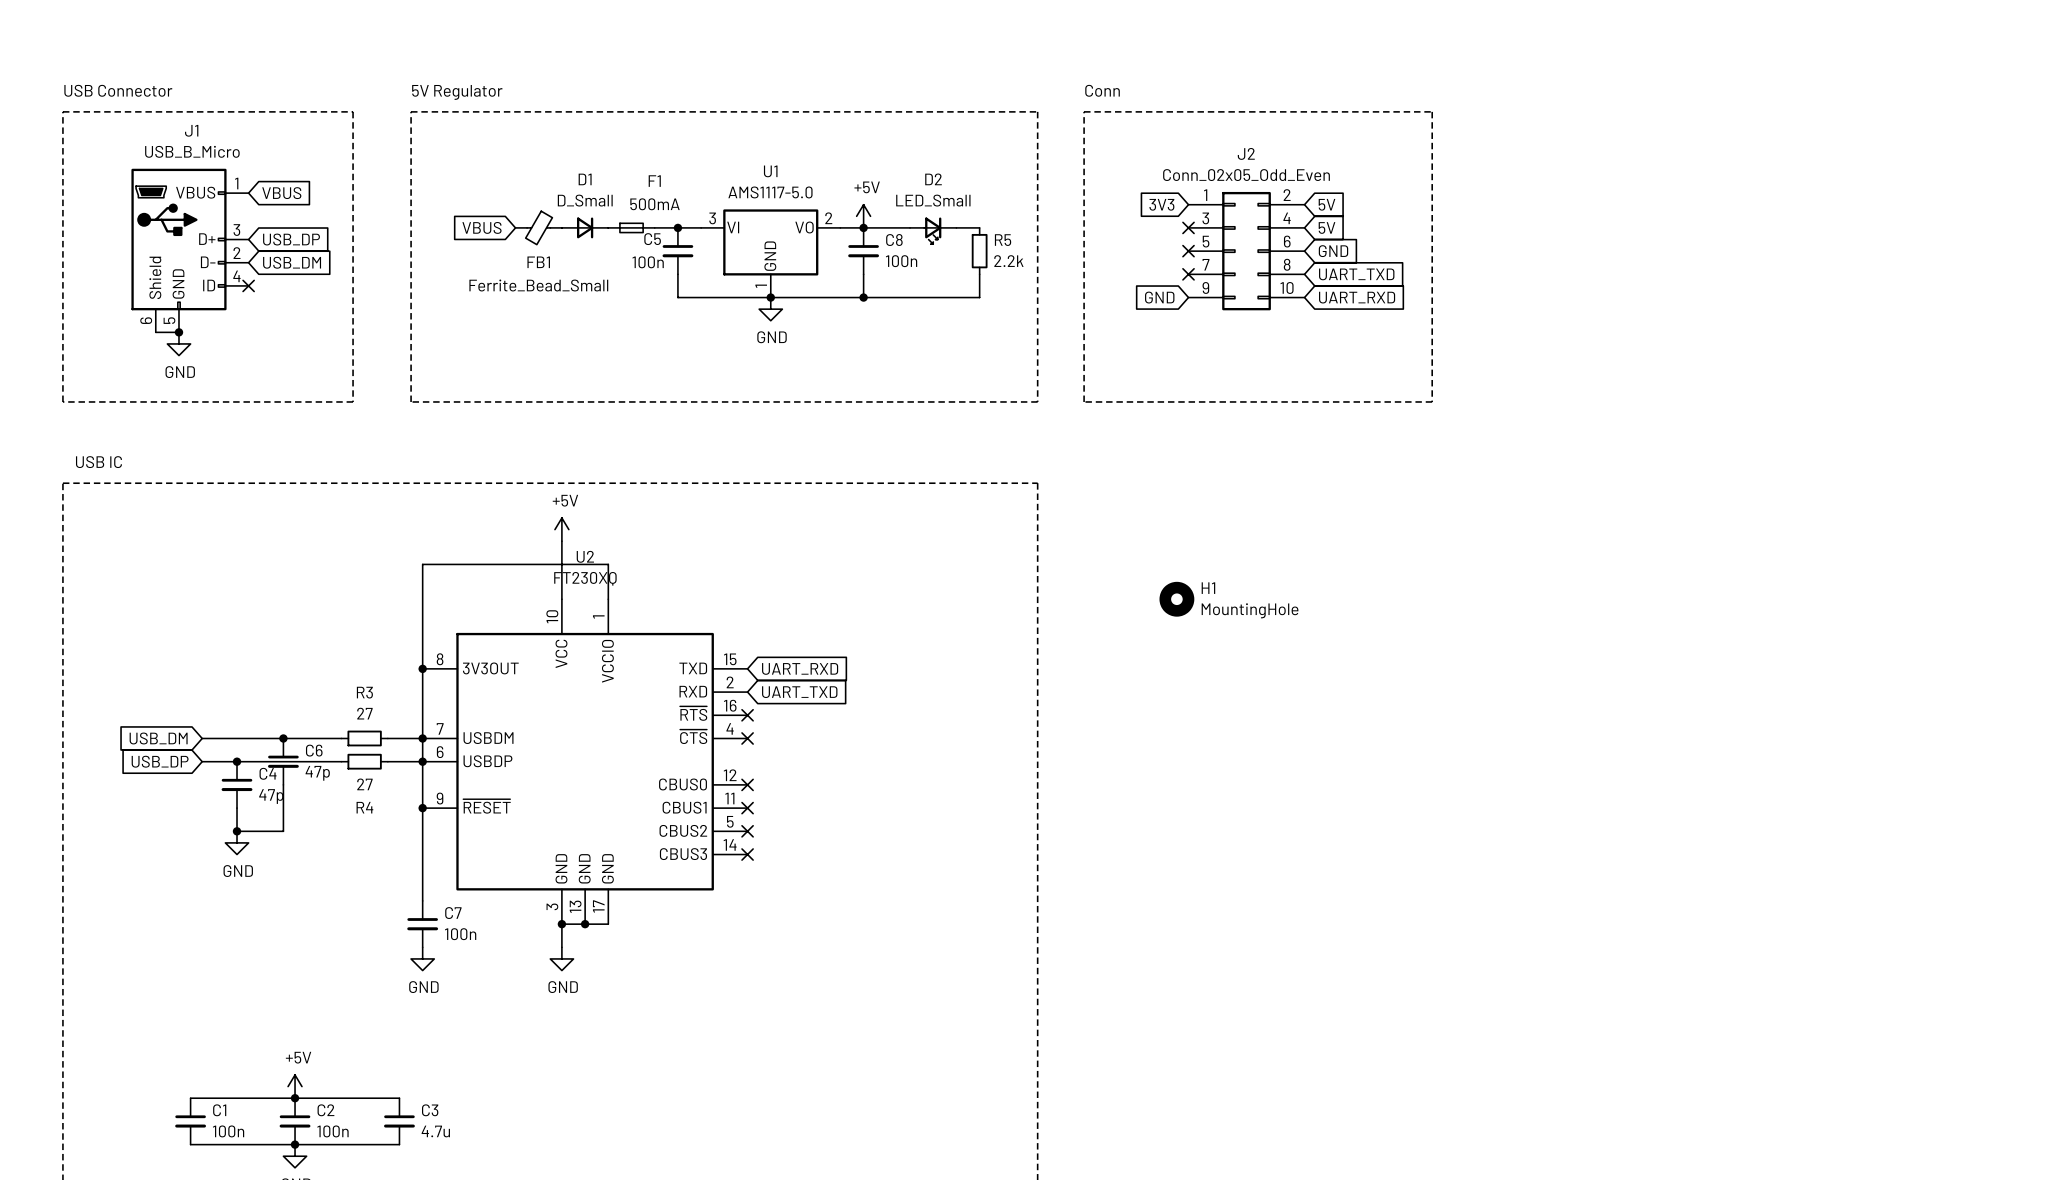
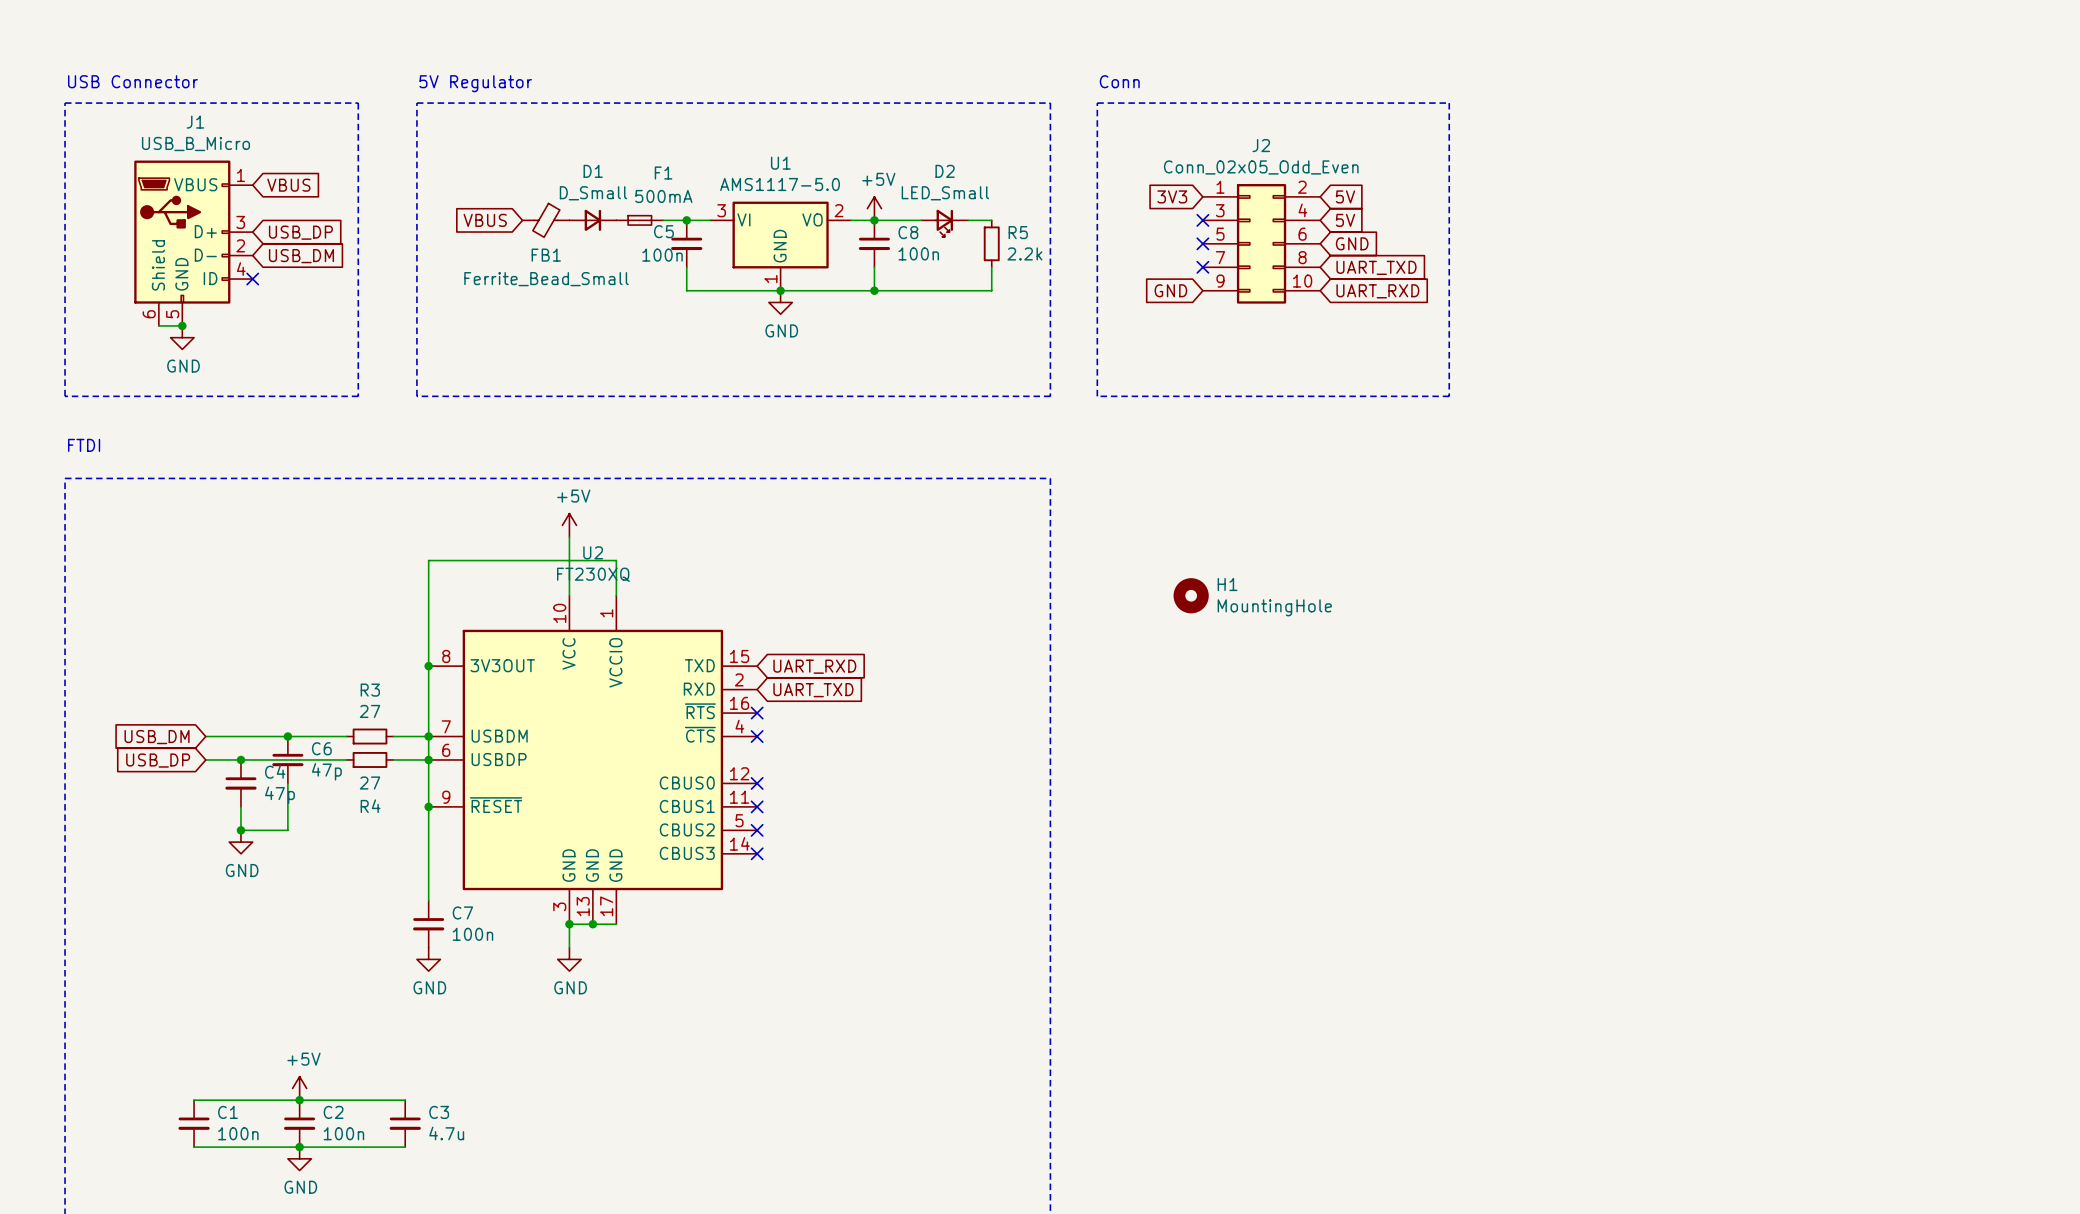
text: none -> FTDI (84, 445)
text: USB IC (98, 462) -> none

